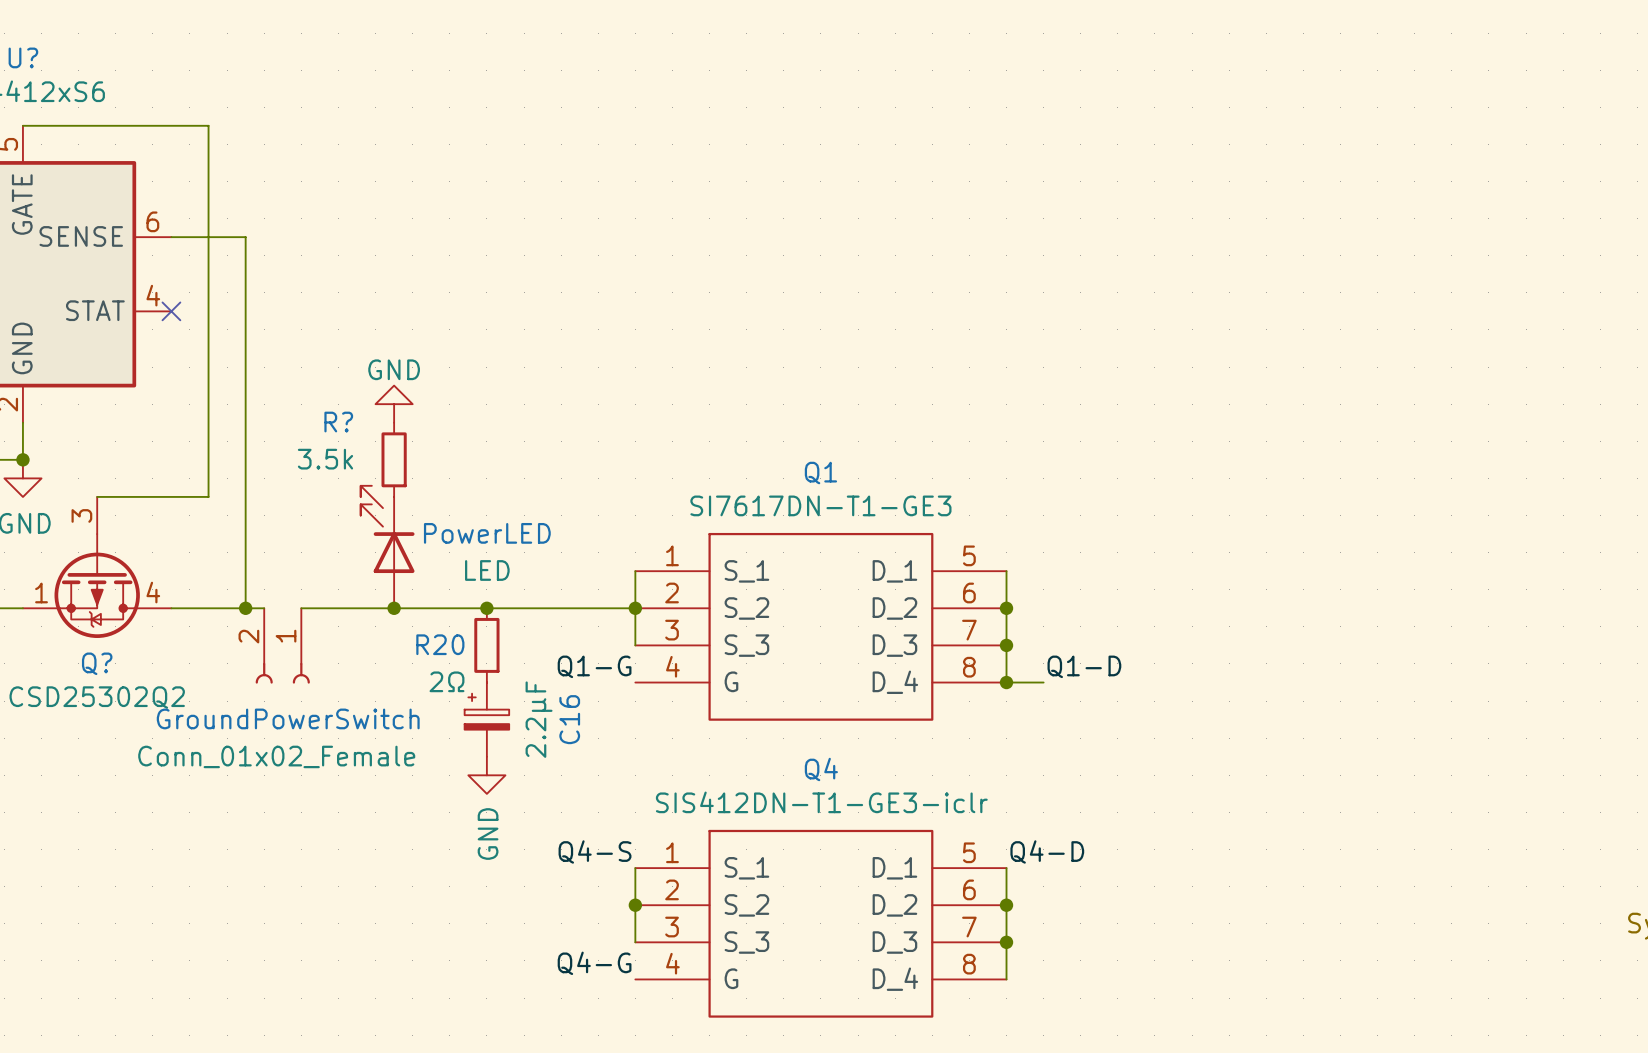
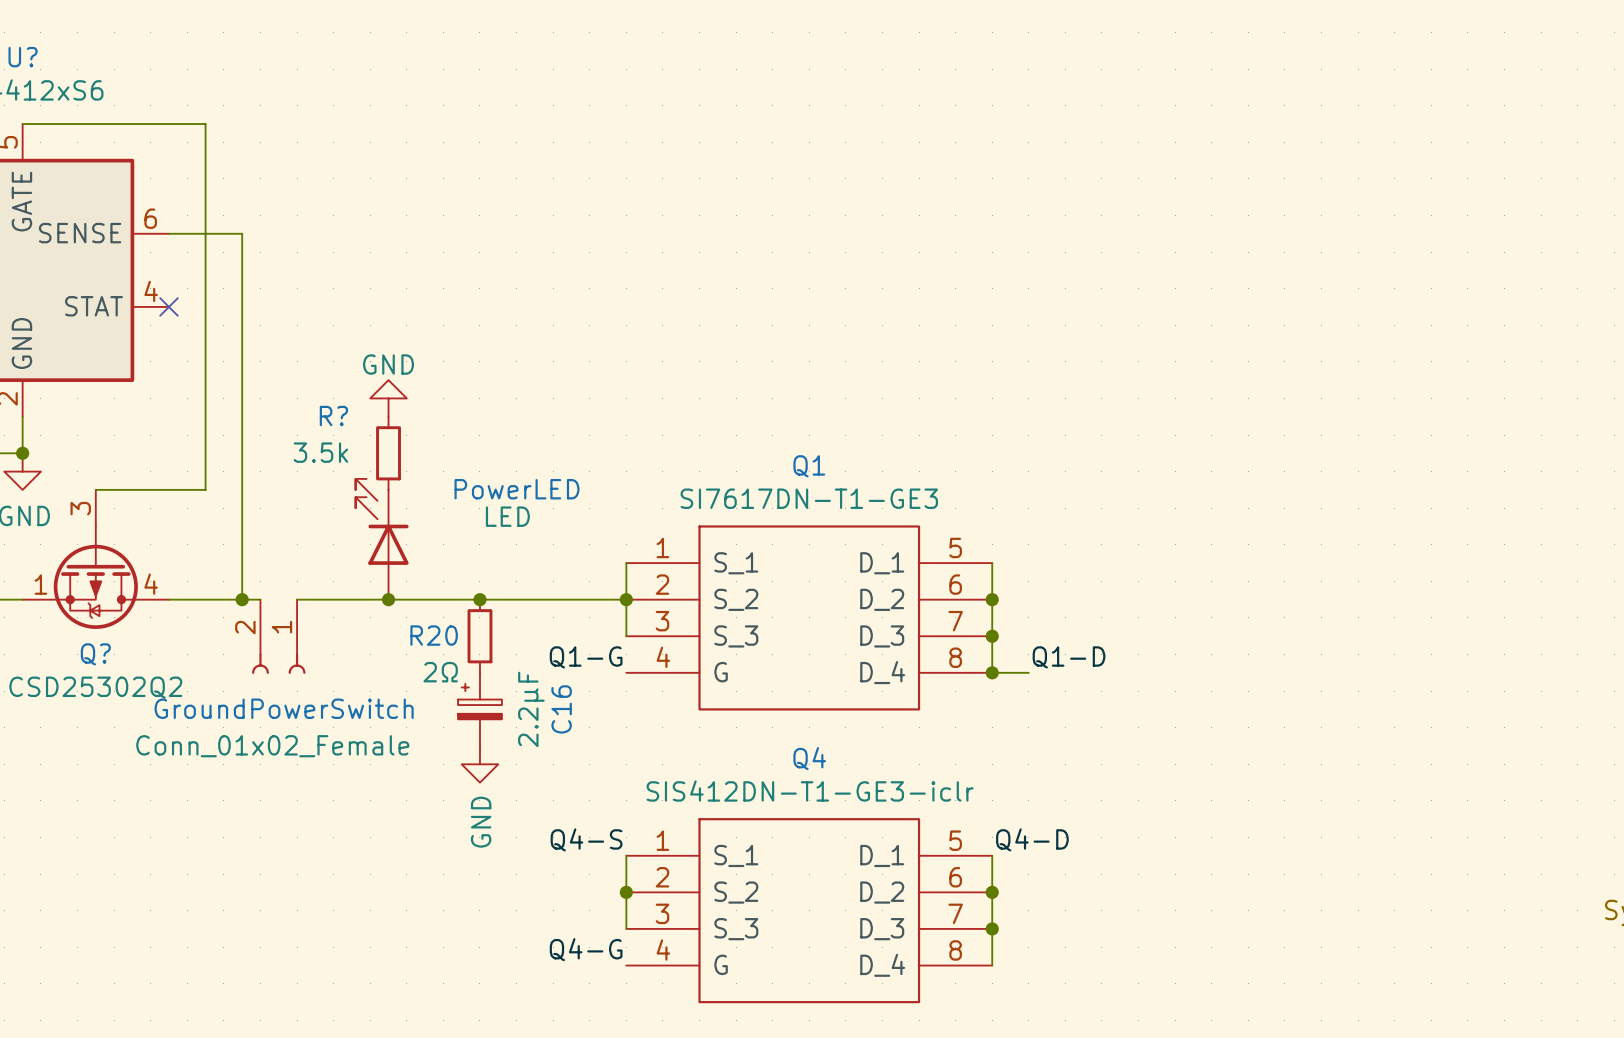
PowerLED name position: PowerLED (487, 533) -> PowerLED (517, 489)
PowerLED value position: LED (487, 570) -> LED (507, 516)

